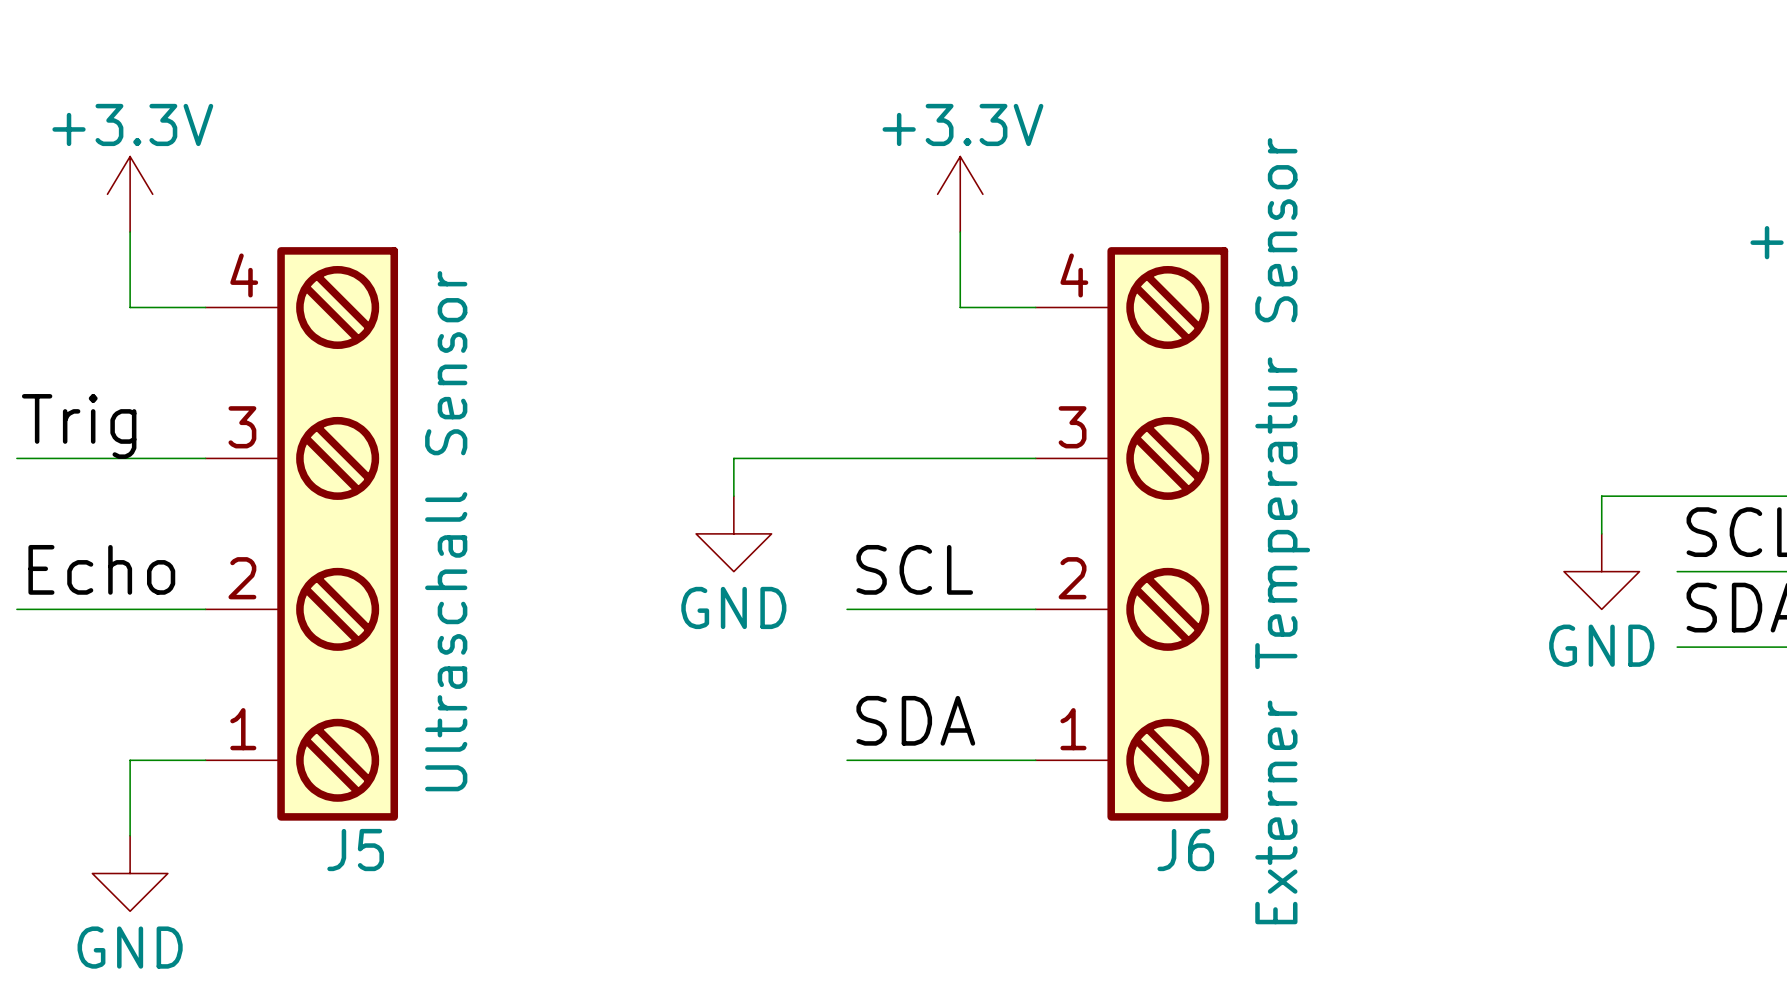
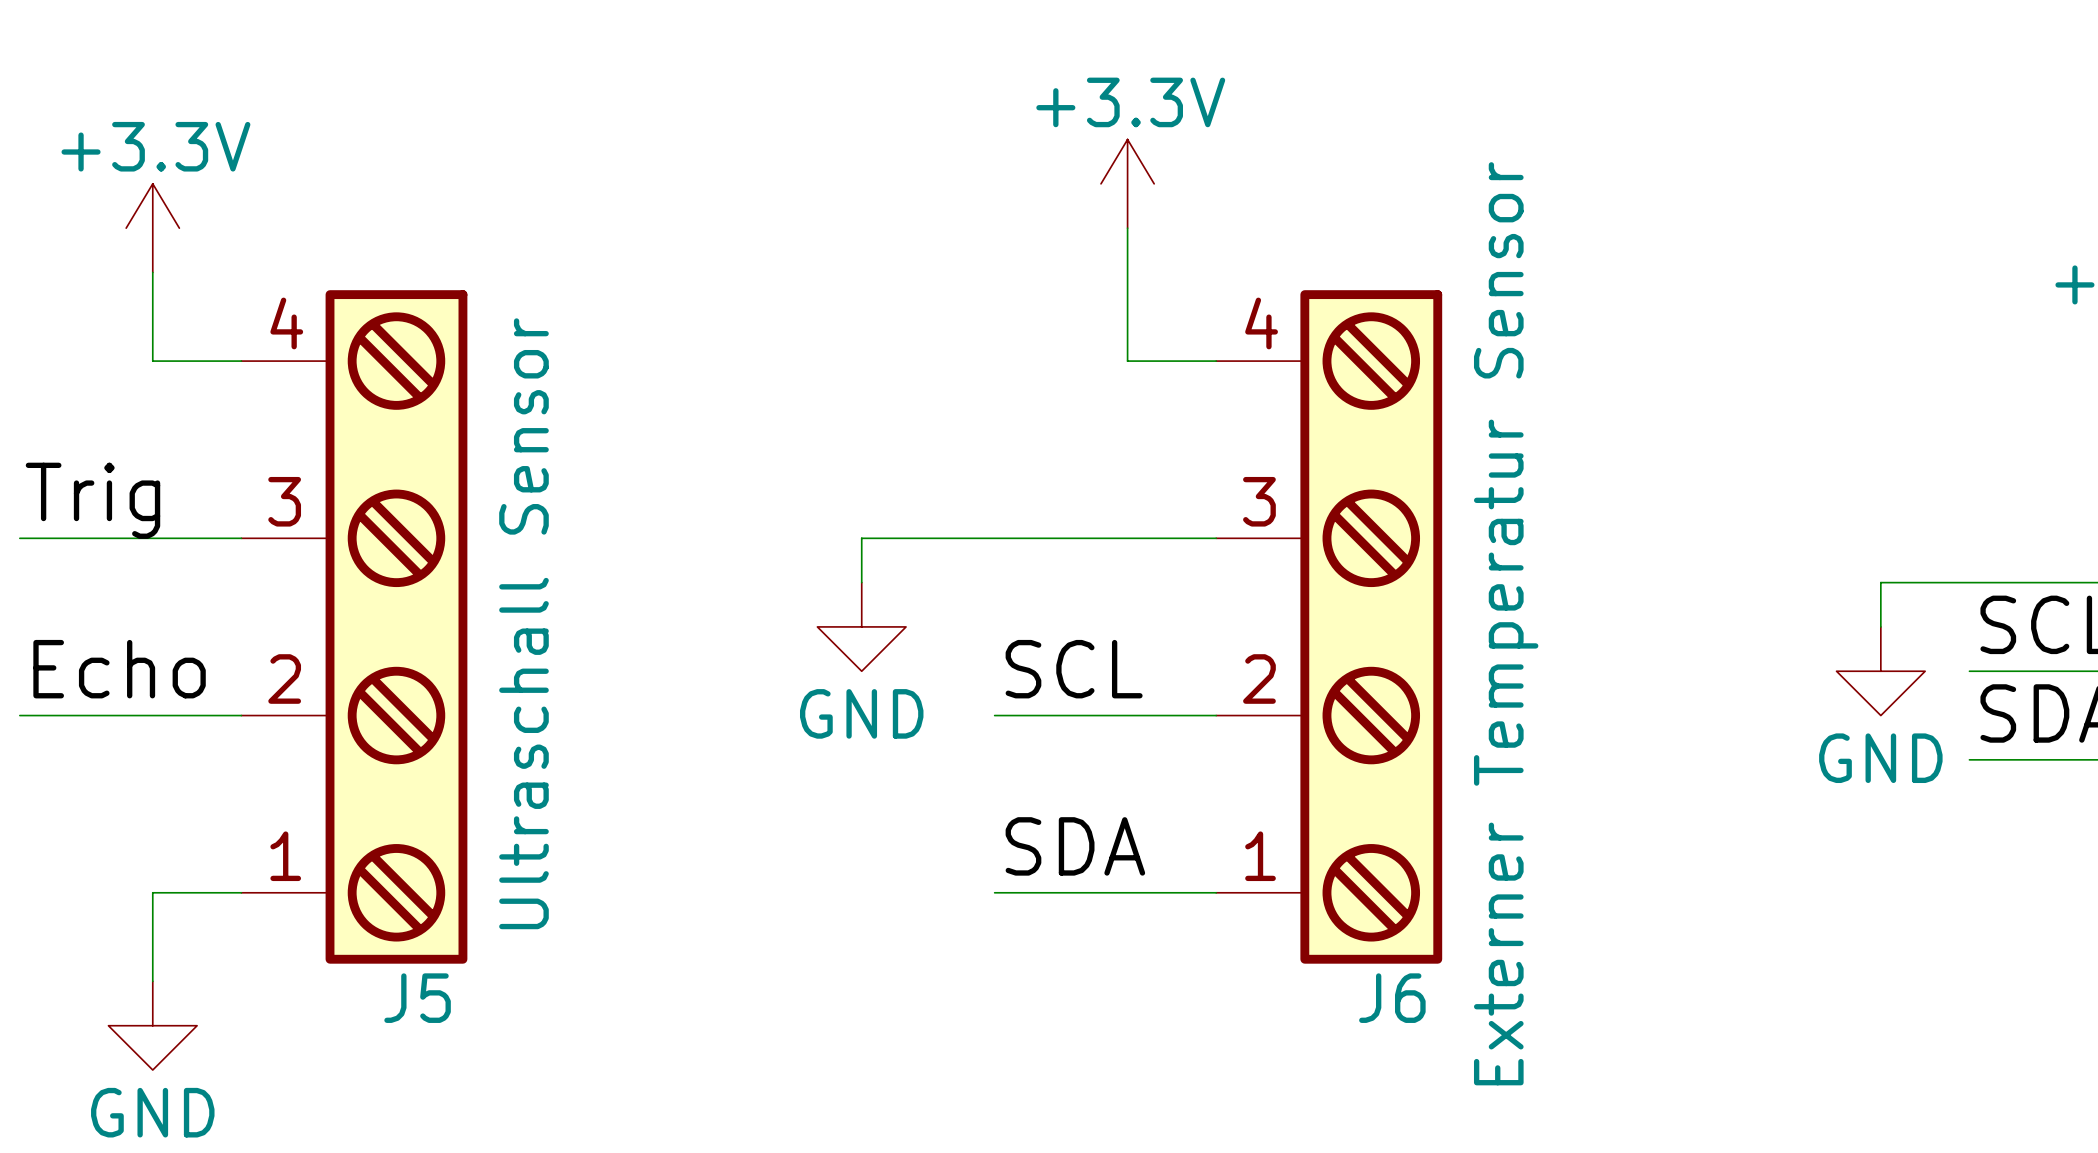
power symbol position: +3.3V (960, 194) -> +3.3V (1127, 183)

